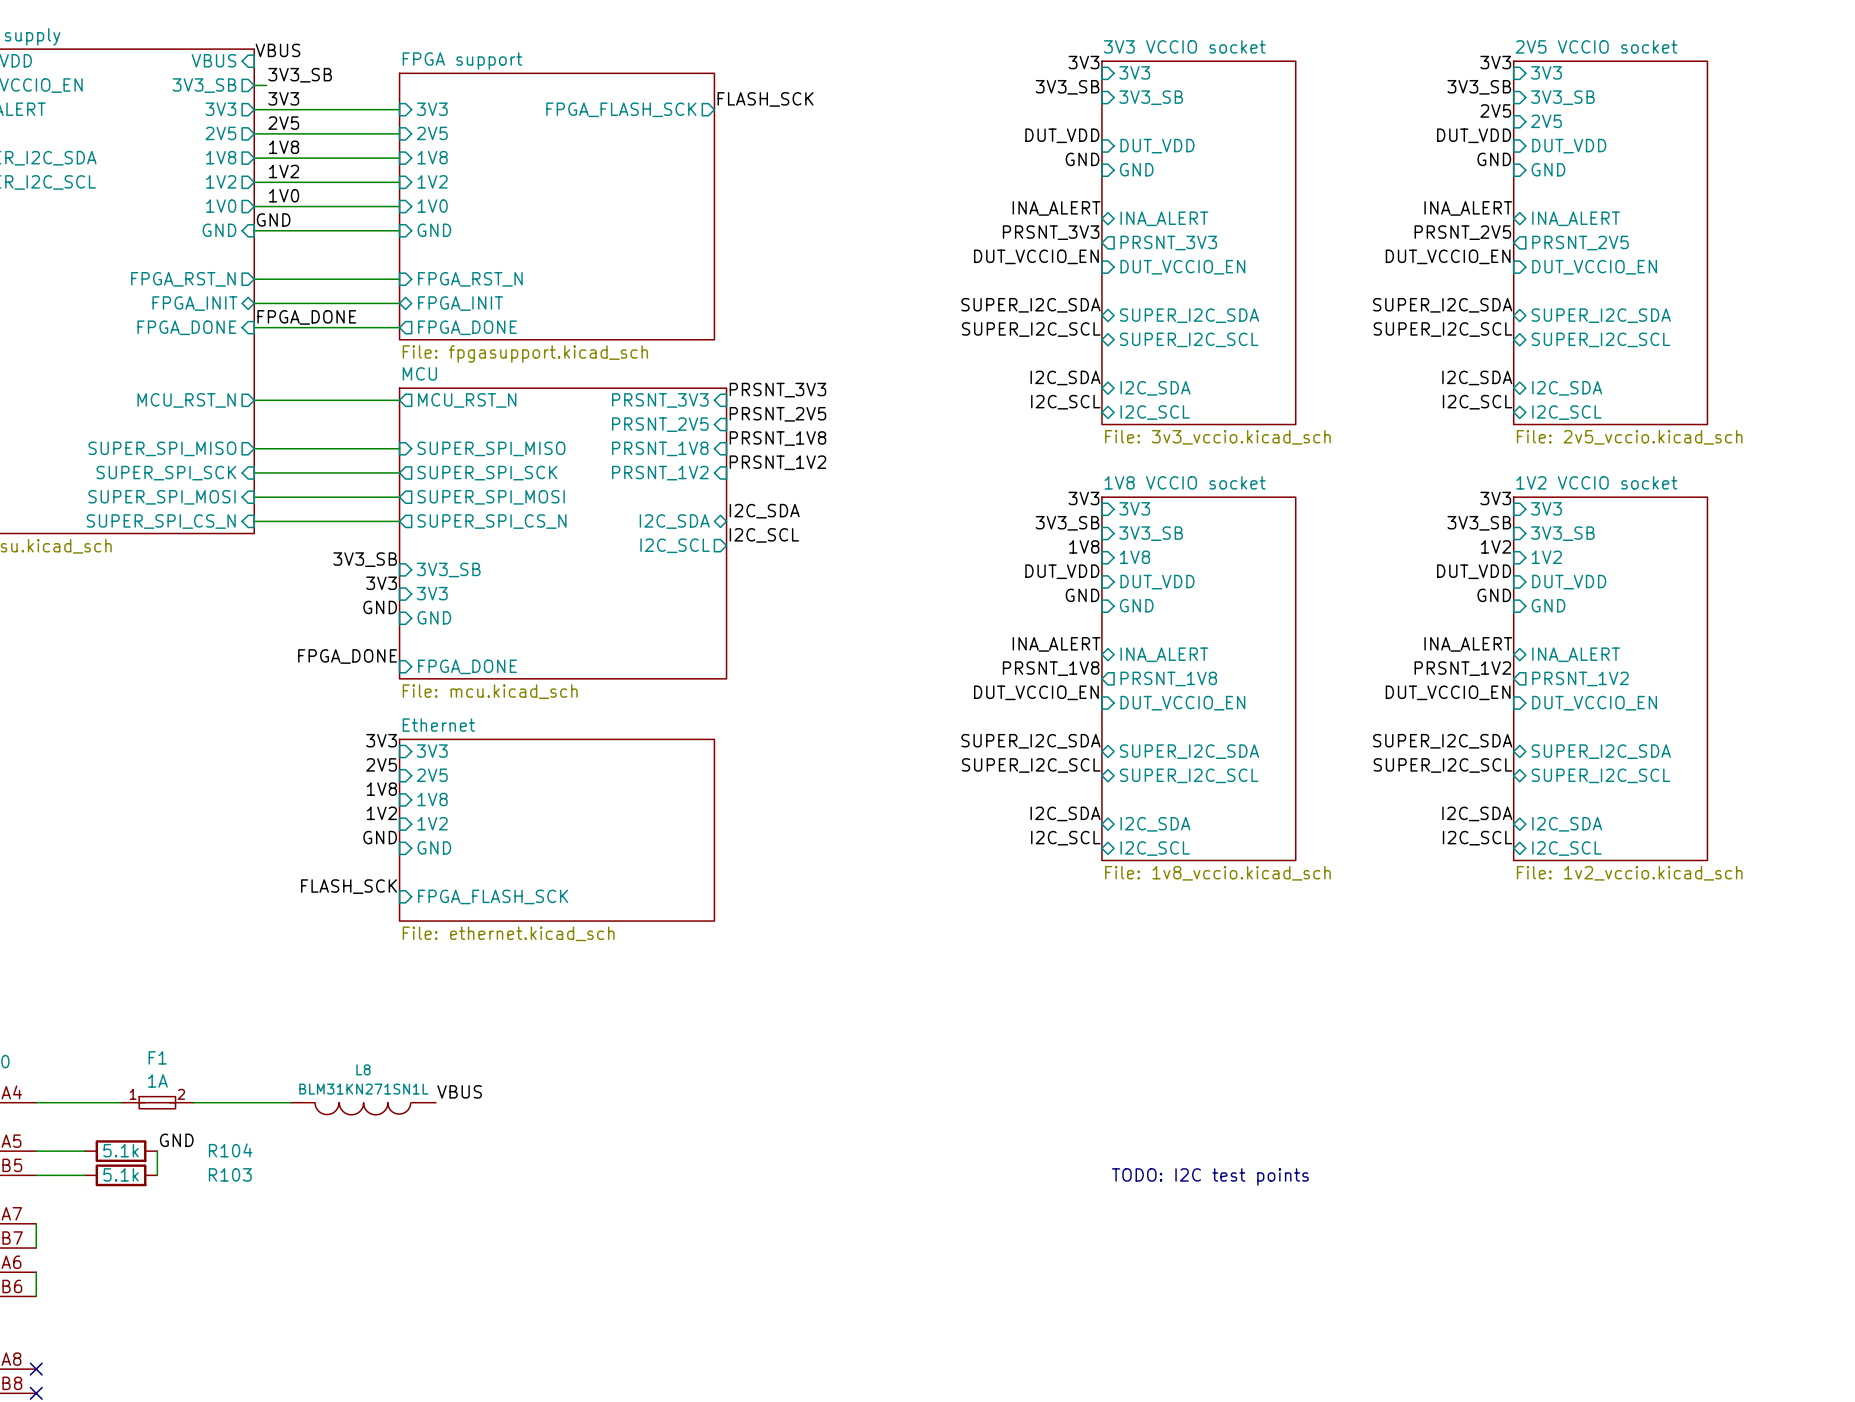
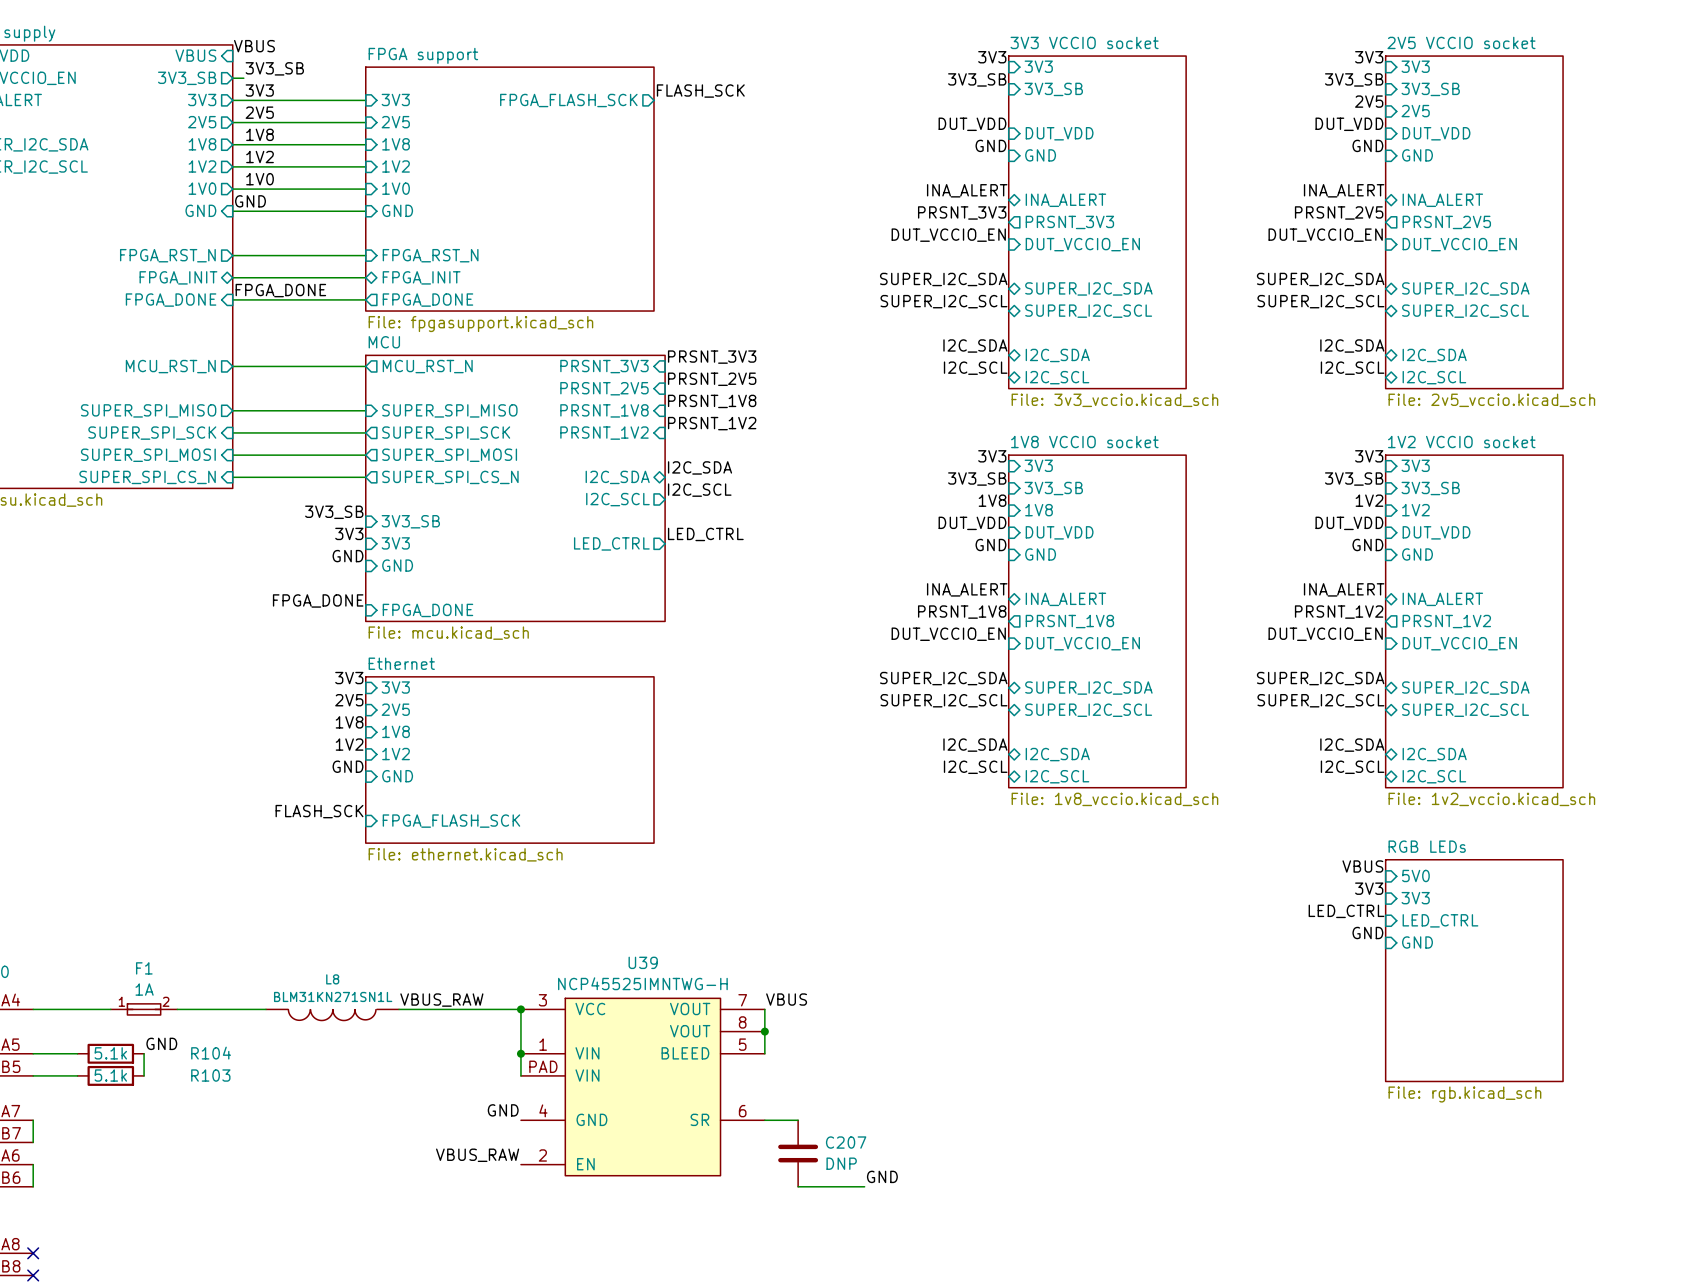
label: none -> LED_CTRL (705, 534)
sheet pin: none -> LED_CTRL (611, 543)
label: none -> VBUS (1362, 866)
sheet pin: none -> 5V0 (1415, 875)
label: none -> 3V3 (1369, 888)
sheet pin: none -> 3V3 (1415, 898)
label: none -> LED_CTRL (1346, 911)
sheet pin: none -> LED_CTRL (1440, 920)
label: none -> GND (1367, 933)
sheet pin: none -> GND (1417, 942)
sheet RGB LEDs: none -> File: rgb.kicad_sch (1474, 970)
label: VBUS (459, 1091) -> VBUS_RAW (441, 1000)
label: none -> VBUS (786, 999)
wire: none -> (399, 1009) (520, 1009) (520, 1075)
junction: none -> (520, 1009)
wire: none -> (764, 1009) (764, 1053)
junction: none -> (764, 1031)
junction: none -> (520, 1053)
text: TODO: I2C test points (1210, 1176) -> none
U39: none -> NCP45525IMNTWG-H (642, 1087)
label: none -> GND (503, 1110)
wire: none -> (764, 1120) (798, 1120)
C207: none -> DNP (798, 1153)
label: none -> VBUS_RAW (477, 1155)
label: none -> GND (882, 1176)
wire: none -> (798, 1186) (864, 1186)

